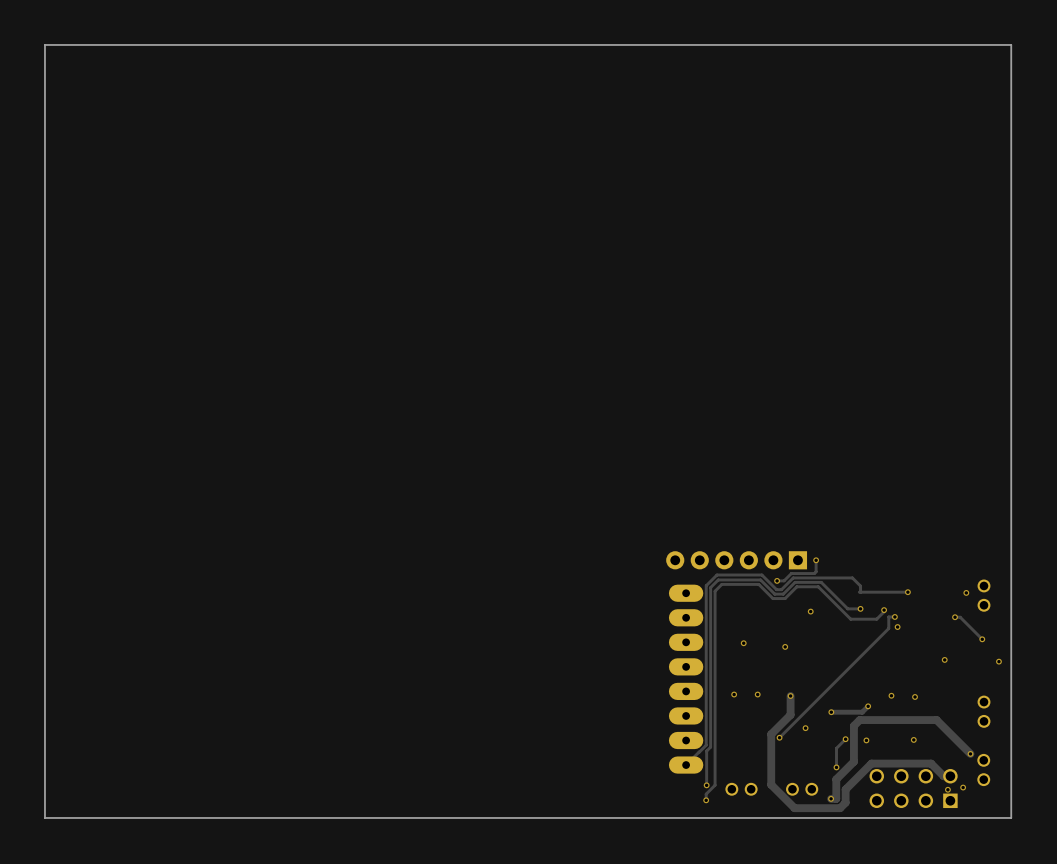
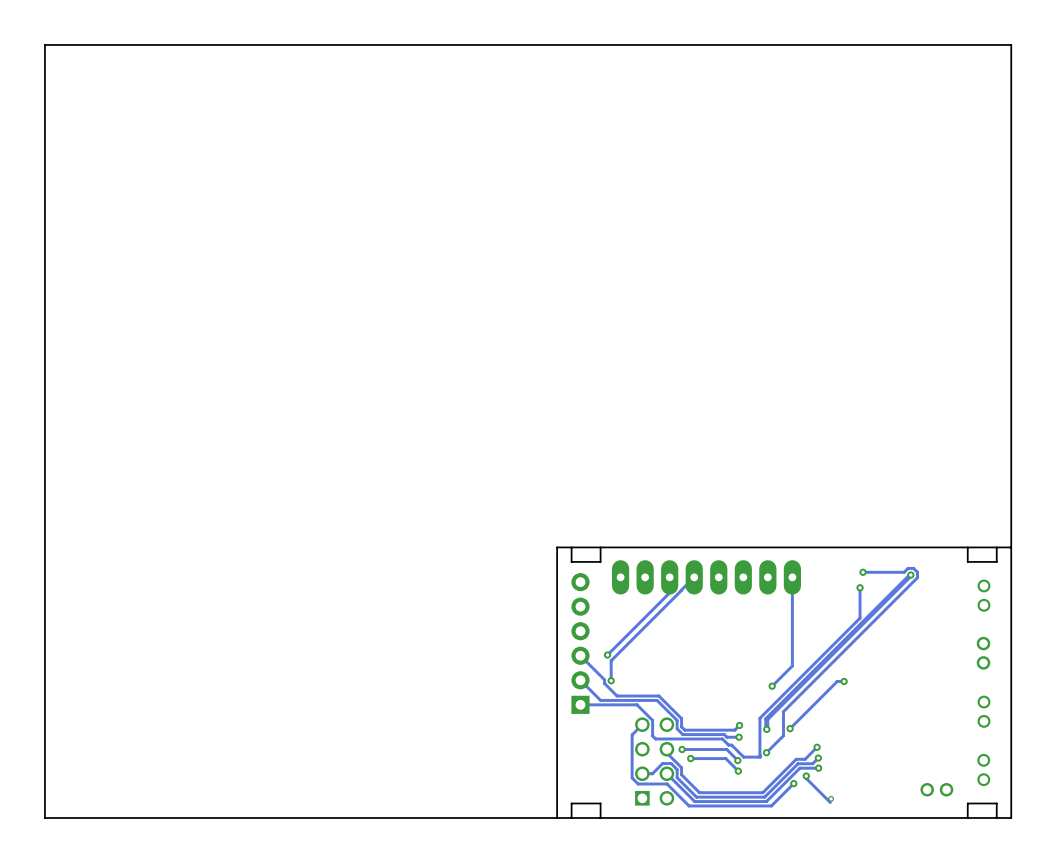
board edge: none -> (600, 547) (600, 561) (571, 561) (571, 547)
board edge: none -> (996, 547) (996, 561) (967, 561) (967, 547)
board edge: none -> (1011, 547) (557, 547) (557, 817)
part rotation: 0° (736, 560) -> 90° clockwise (580, 643)
part position: (736, 560) -> (580, 643)
track: (816, 560) (814, 573) (791, 573) (784, 580) (777, 580) -> none
via: (816, 560) -> none
track: none -> (862, 572) (904, 572) (908, 568) (913, 568) (917, 572) (917, 577) (783, 711) (783, 735) (766, 752)
via: none -> (862, 572)
track: none -> (910, 575) (766, 719) (766, 729)
via: none -> (910, 575)
track: none -> (669, 577) (669, 592) (607, 655)
track: none -> (694, 577) (611, 660) (611, 680)
track: none -> (792, 577) (792, 665) (772, 686)
via: (777, 580) -> none
track: none -> (860, 587) (860, 618) (759, 718) (760, 757) (743, 757) (722, 738) (655, 738) (652, 735) (652, 720) (637, 704) (580, 704)
via: none -> (860, 587)
track: (860, 592) (860, 586) (852, 577) (793, 577) (781, 589) (776, 589) (761, 575) (716, 575) (706, 585) (706, 745) (686, 765) -> none
track: (907, 592) (859, 592) -> none
via: (907, 592) -> none
via: (966, 592) -> none
track: (860, 608) (847, 608) (821, 582) (795, 582) (783, 594) (774, 594) (760, 579) (718, 579) (710, 587) (710, 747) (706, 751) (706, 785) -> none
via: (860, 608) -> none
track: (884, 610) (876, 619) (850, 619) (818, 586) (796, 586) (785, 598) (772, 598) (758, 584) (721, 584) (715, 591) (715, 785) (706, 794) (706, 800) -> none
via: (884, 610) -> none
via: (810, 611) -> none
track: (894, 616) (888, 616) (888, 628) (779, 737) -> none
via: (894, 616) -> none
track: (955, 617) (960, 617) (982, 639) -> none
via: (955, 617) -> none
via: (897, 627) -> none
via: (982, 639) -> none
via: (743, 643) -> none
via: (785, 646) -> none
part: none -> (983, 653)
track: none -> (580, 655) (604, 679) (604, 683) (617, 696) (658, 696) (681, 718) (681, 726) (684, 730) (734, 730) (739, 725)
via: none -> (607, 655)
via: (944, 659) -> none
via: (998, 661) -> none
part rotation: 0° (686, 679) -> 90° clockwise (706, 577)
track: none -> (580, 680) (600, 700) (657, 700) (677, 720) (677, 728) (682, 734) (724, 734) (727, 737) (739, 737)
via: none -> (611, 680)
track: none -> (844, 681) (837, 681) (790, 728)
via: none -> (844, 681)
via: none -> (772, 686)
via: (734, 694) -> none
via: (757, 694) -> none
via: (891, 695) -> none
track: (790, 696) (790, 714) (771, 734) (771, 784) (794, 808) (840, 808) (845, 802) (845, 789) (871, 763) (931, 763) (943, 776) (950, 776) -> none
via: (790, 696) -> none
via: (915, 696) -> none
track: (868, 706) (862, 712) (831, 712) -> none
via: (868, 706) -> none
via: (831, 712) -> none
track: none -> (642, 724) (632, 734) (632, 777) (638, 783) (667, 783) (689, 805) (771, 805) (793, 783)
via: none -> (739, 725)
via: none -> (790, 728)
via: (805, 728) -> none
via: none -> (766, 729)
via: none -> (739, 737)
via: (779, 737) -> none
track: (845, 739) (836, 748) (836, 767) -> none
via: (845, 739) -> none
via: (913, 739) -> none
via: (866, 740) -> none
track: none -> (817, 747) (805, 759) (796, 759) (762, 792) (699, 792) (681, 774) (681, 767) (666, 753) (666, 749)
via: none -> (817, 747)
track: none -> (682, 749) (726, 749) (737, 760)
via: none -> (682, 749)
via: none -> (766, 752)
track: (970, 753) (936, 720) (859, 720) (853, 725) (853, 761) (836, 779) (836, 798) (831, 798) -> none
via: (970, 753) -> none
track: none -> (690, 758) (725, 758) (738, 771)
via: none -> (690, 758)
track: none -> (818, 758) (812, 763) (798, 763) (764, 797) (696, 797) (677, 777) (677, 769) (671, 763) (662, 763) (652, 773) (642, 773)
via: none -> (818, 758)
via: none -> (737, 760)
part: none -> (654, 761)
via: (836, 767) -> none
track: none -> (818, 768) (799, 768) (766, 801) (694, 801) (666, 773)
via: none -> (818, 768)
via: none -> (738, 771)
track: none -> (806, 776) (806, 778) (830, 802)
via: none -> (806, 776)
via: none -> (793, 783)
via: (706, 785) -> none
via: (963, 787) -> none
part: (913, 788) -> none
part: (741, 789) -> none
part: (802, 789) -> none
part: none -> (936, 789)
via: (947, 789) -> none
via: (706, 800) -> none
board edge: none -> (600, 817) (600, 803) (571, 803) (571, 817)
board edge: none -> (996, 817) (996, 803) (967, 803) (967, 817)

